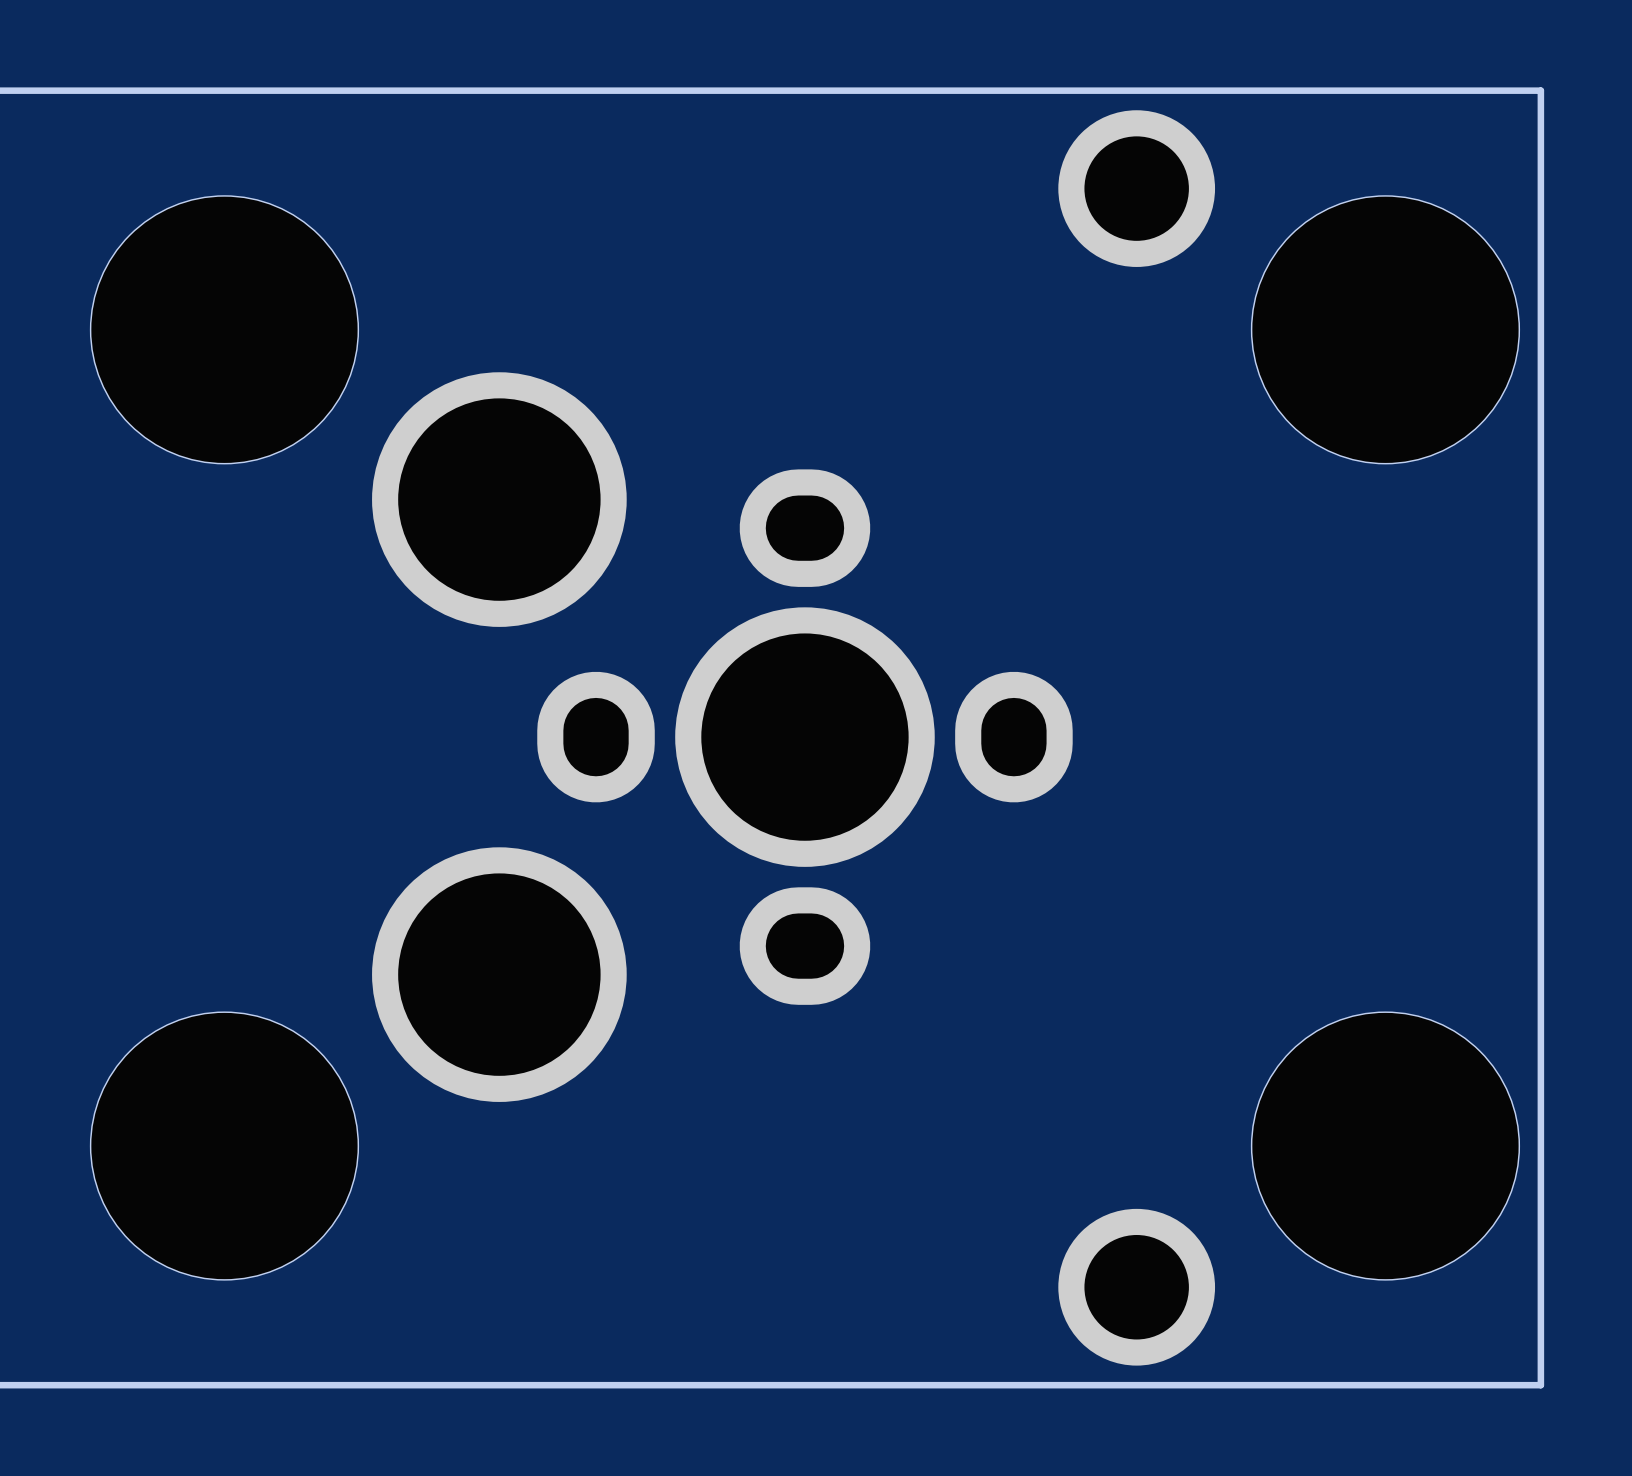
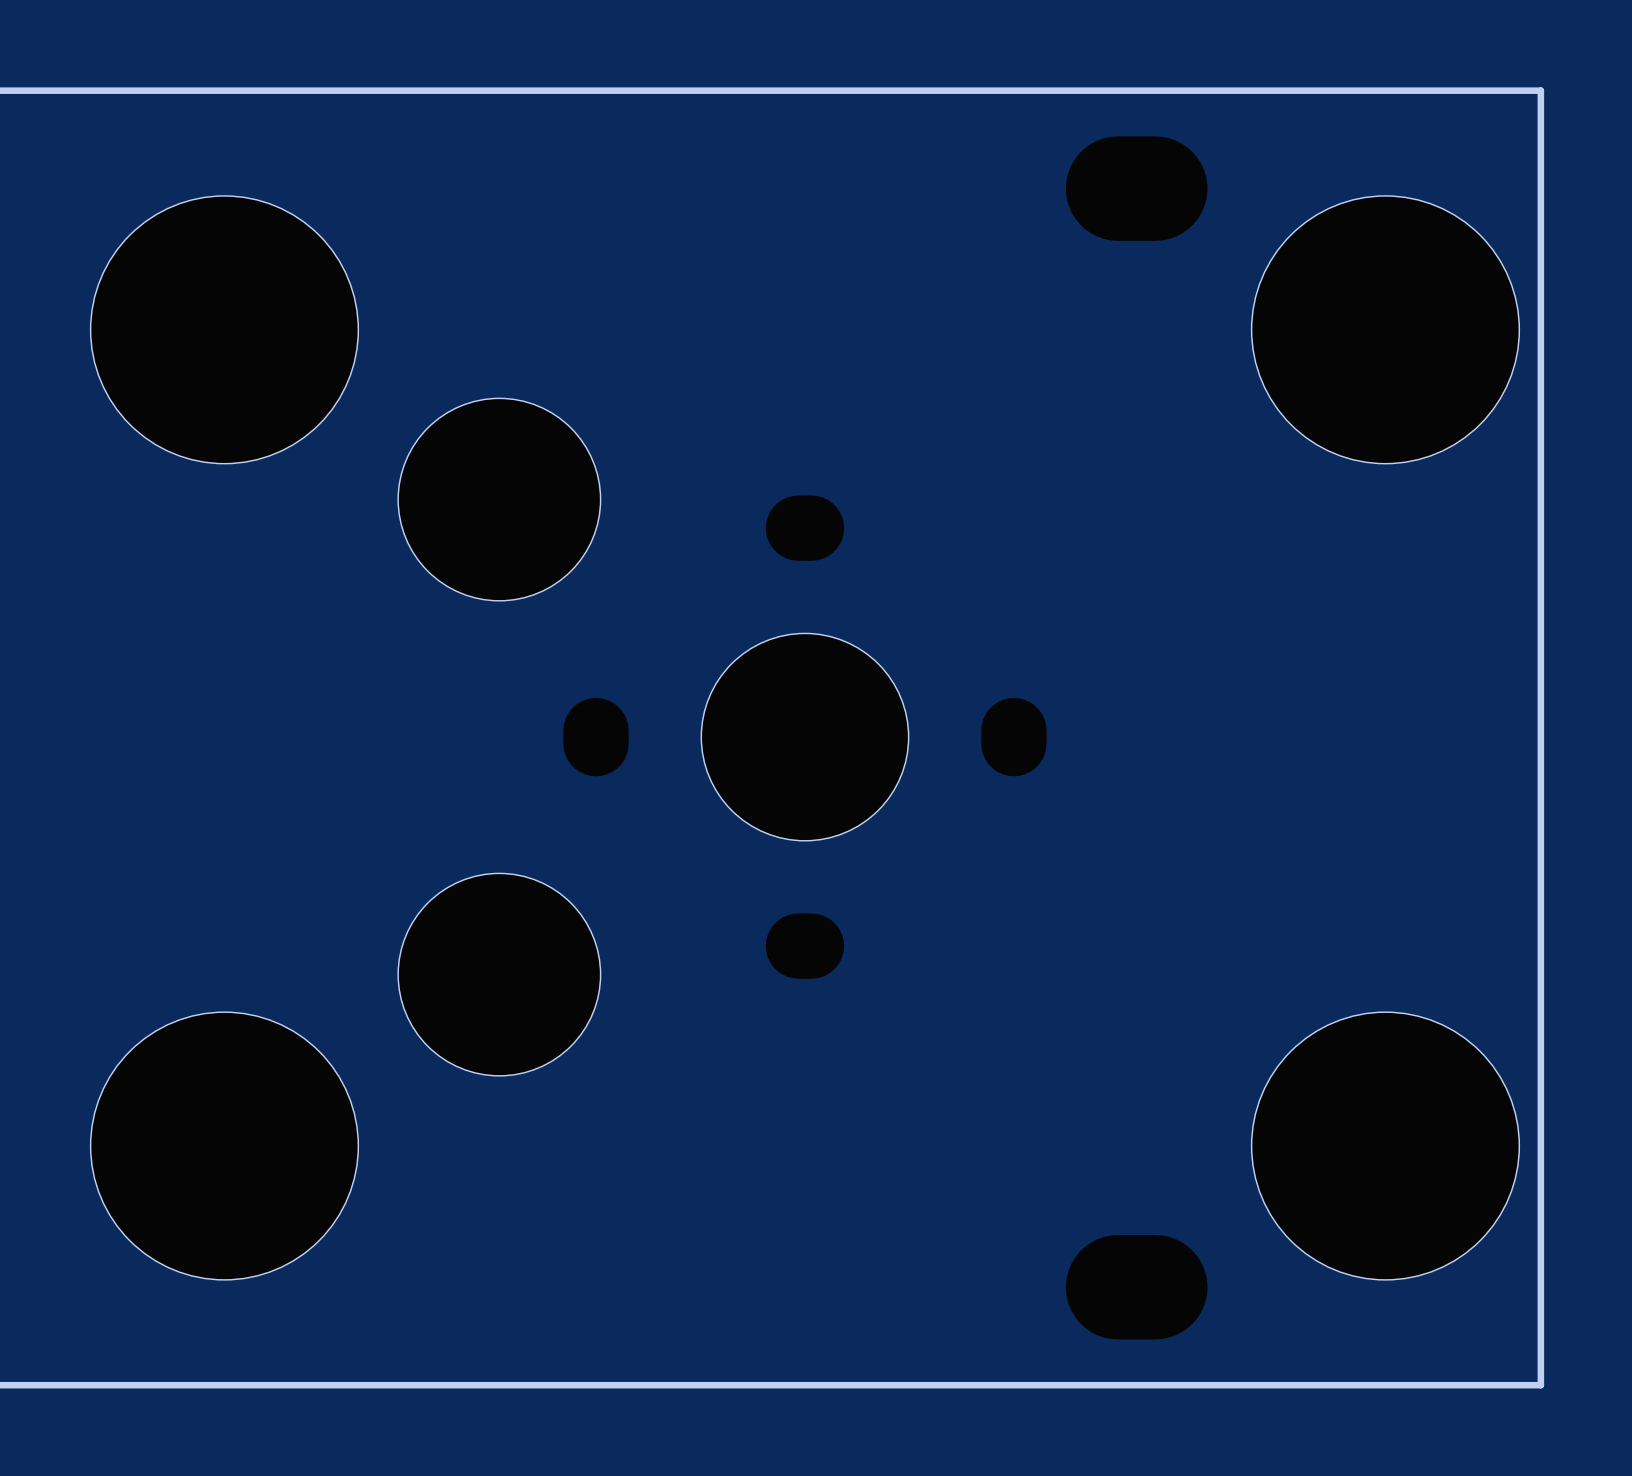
part footprint: [1058, 110, 1216, 267] -> [1065, 136, 1208, 241]
part footprint: [372, 372, 627, 627] -> [398, 398, 601, 601]
part footprint: [537, 469, 1073, 1005] -> [563, 495, 1047, 979]
part footprint: [372, 847, 627, 1102] -> [398, 873, 601, 1076]
part footprint: [1058, 1208, 1216, 1366] -> [1065, 1235, 1208, 1340]

